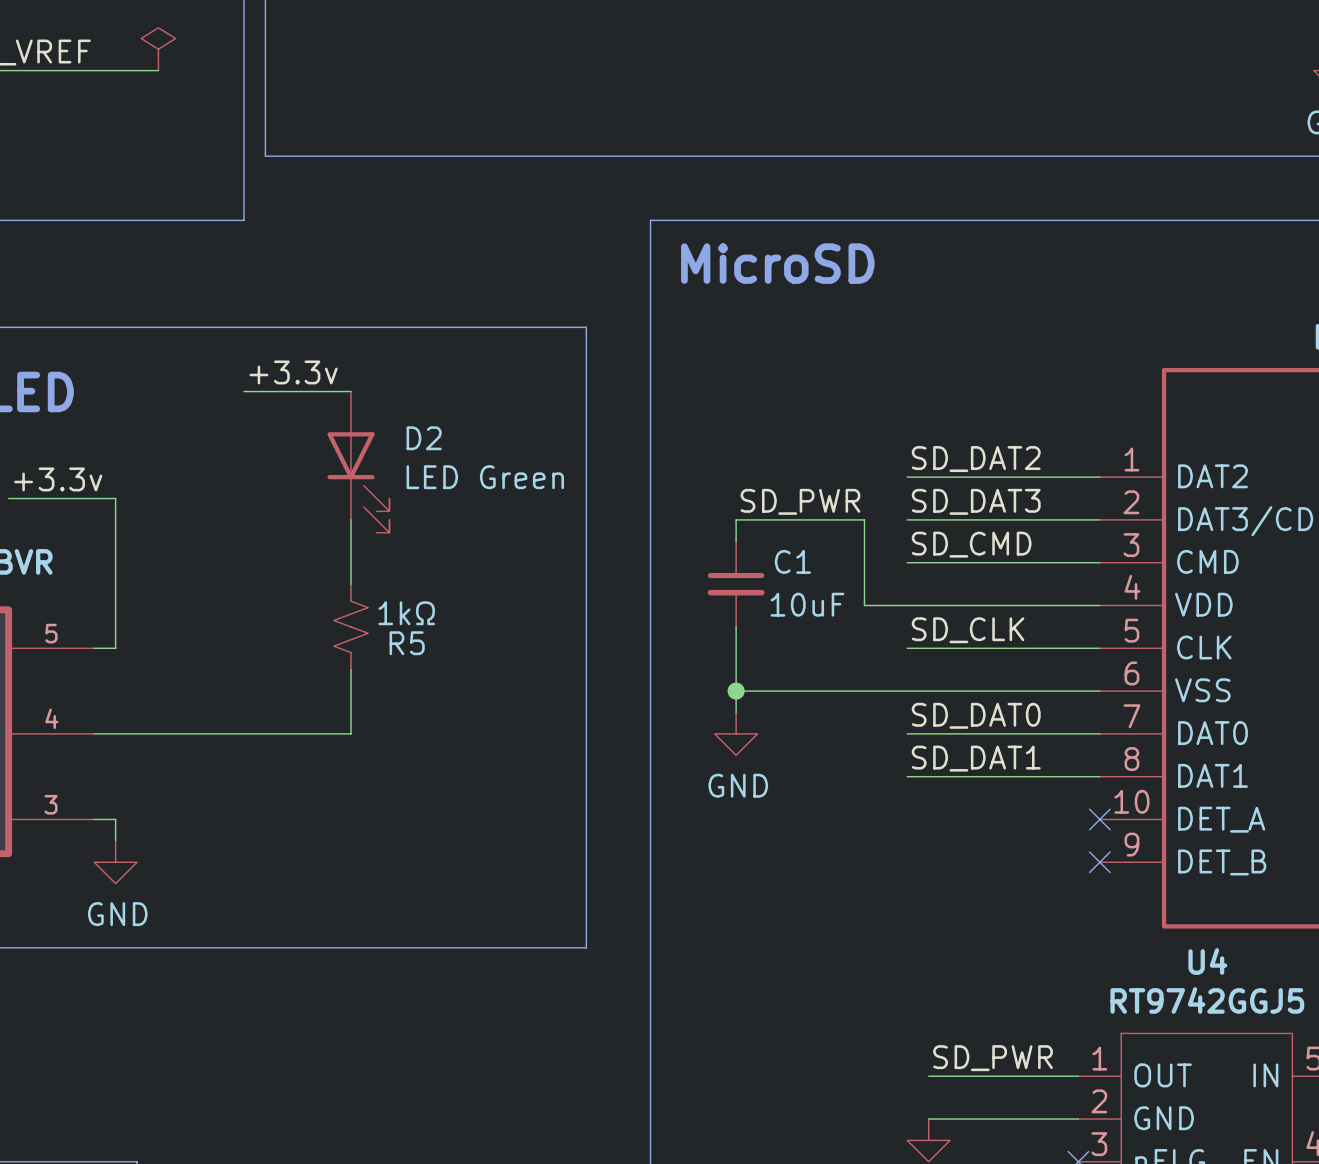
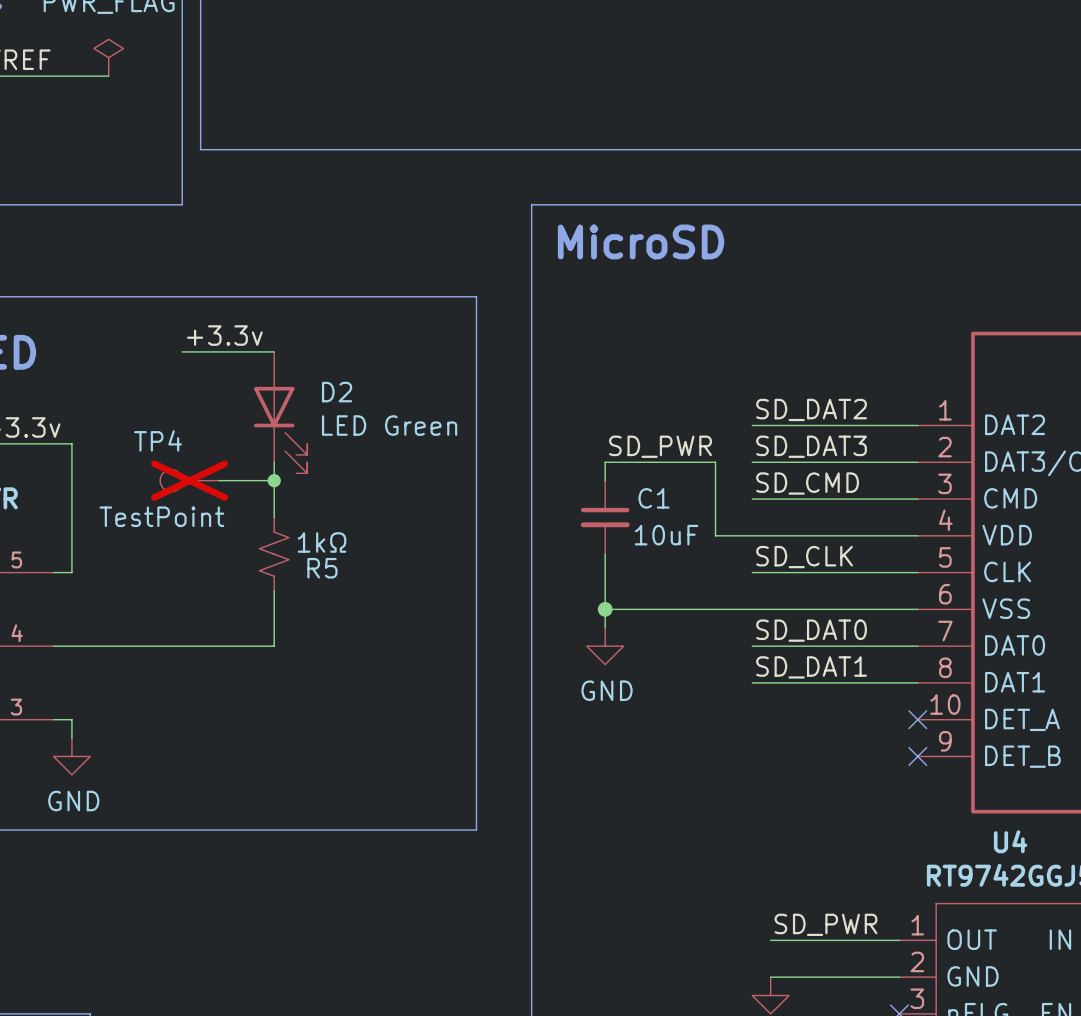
TP4: none -> TestPoint (189, 480)
wire: none -> (219, 480) (274, 480)
junction: none -> (274, 480)

